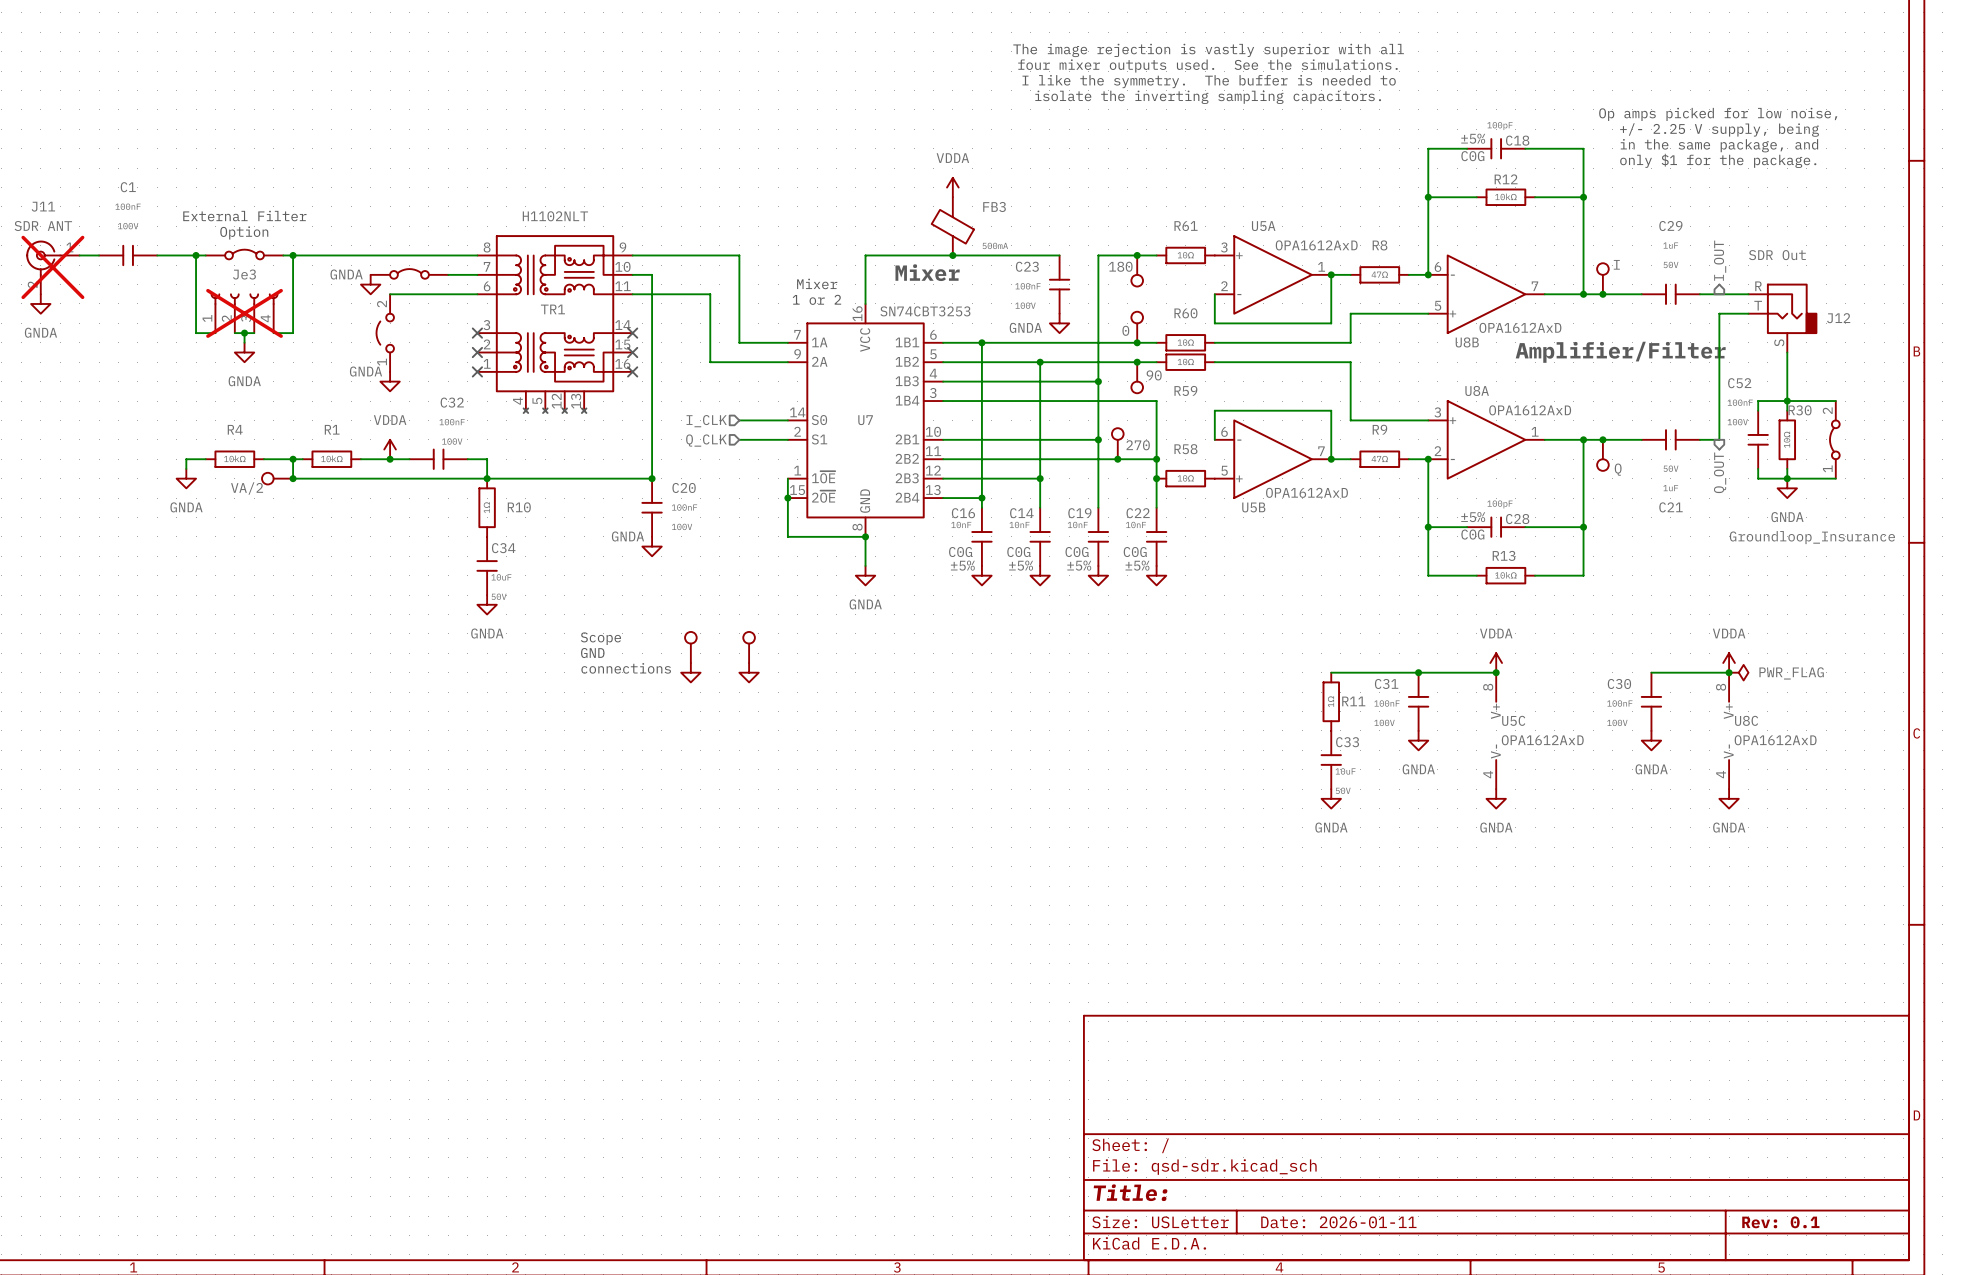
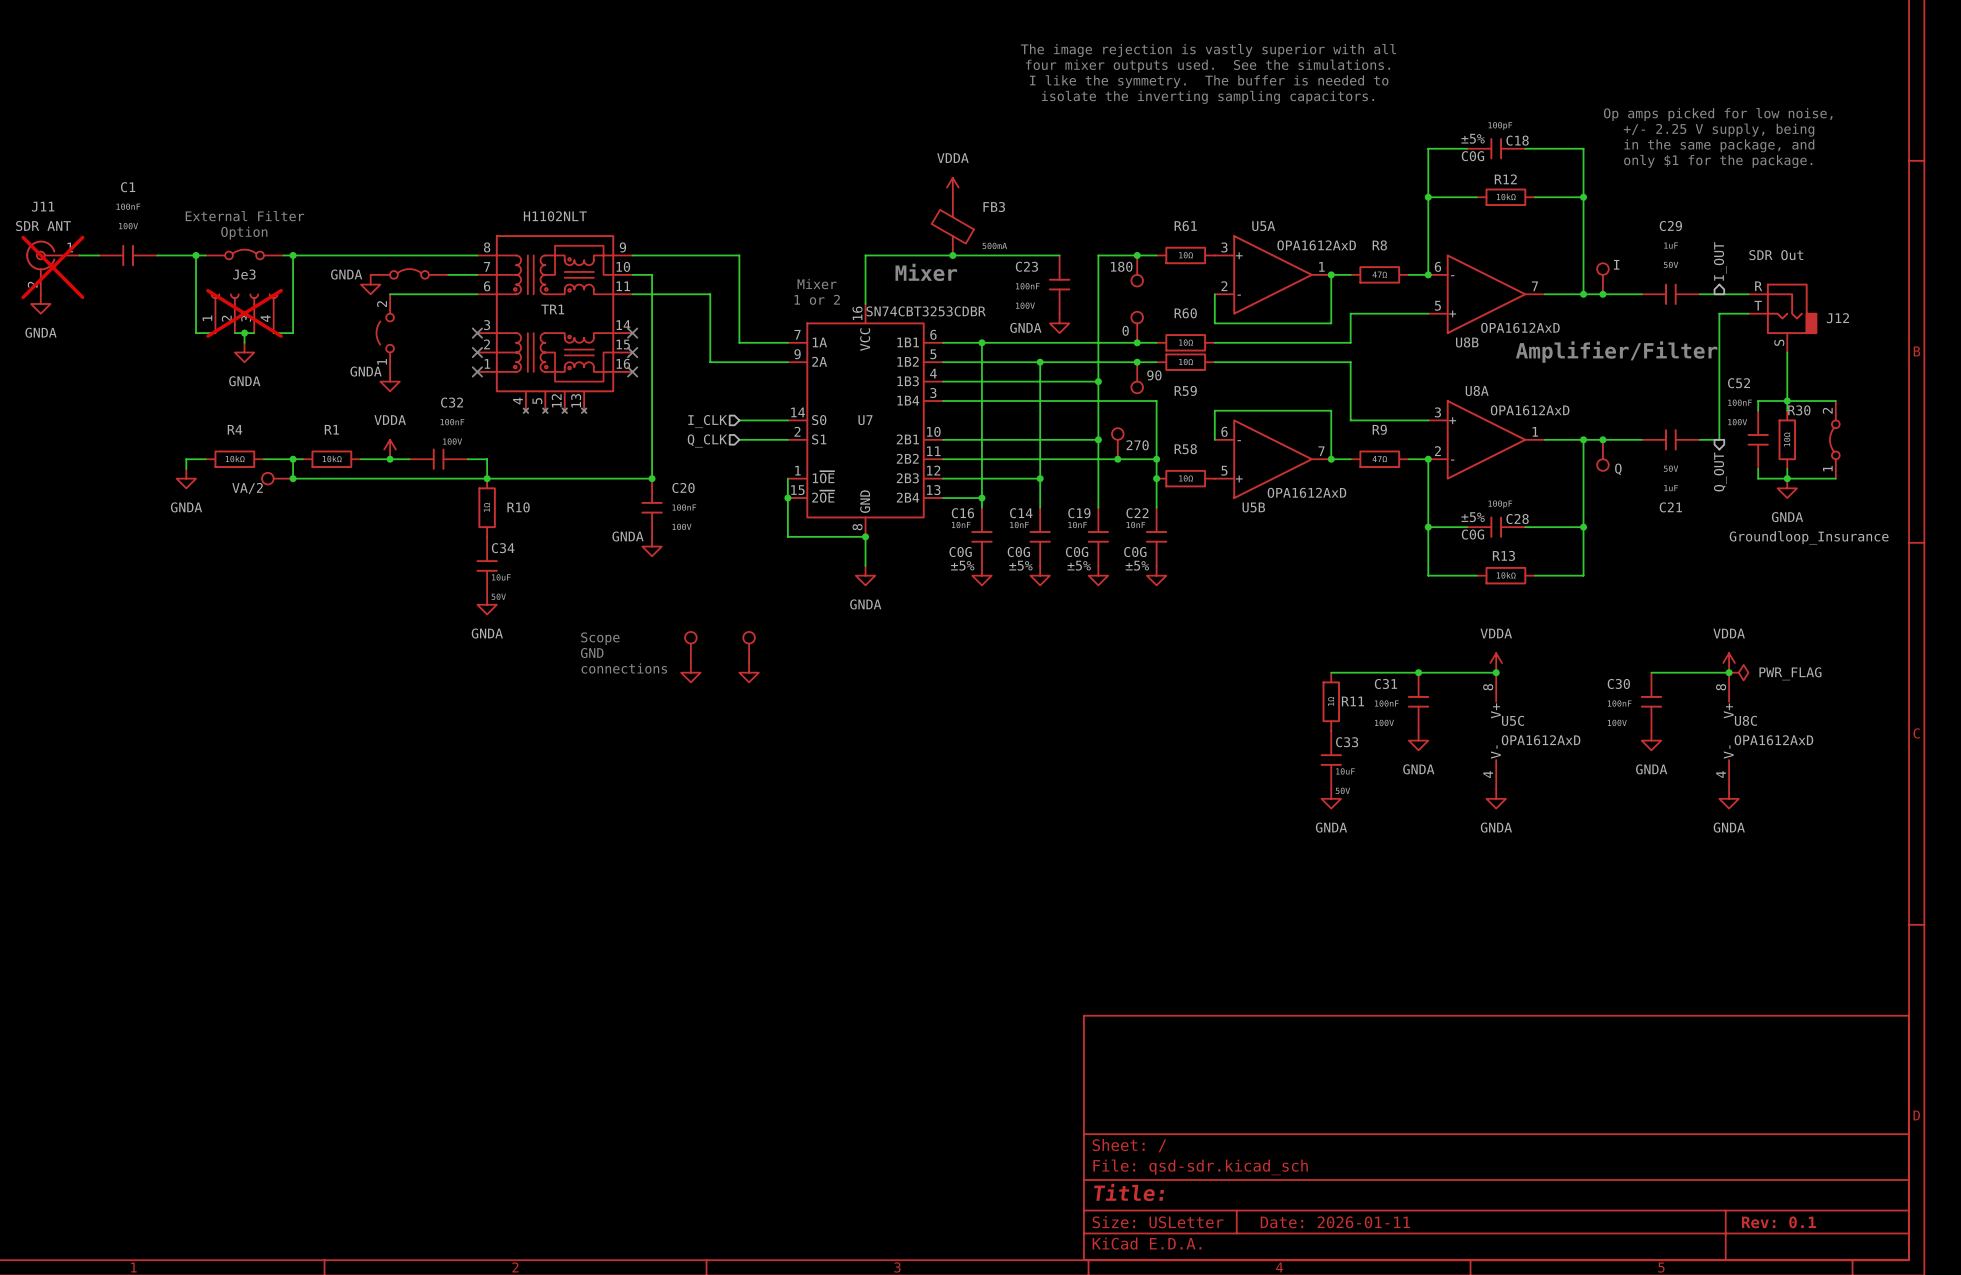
U7 value: SN74CBT3253 (925, 311) -> SN74CBT3253CDBR (926, 311)

